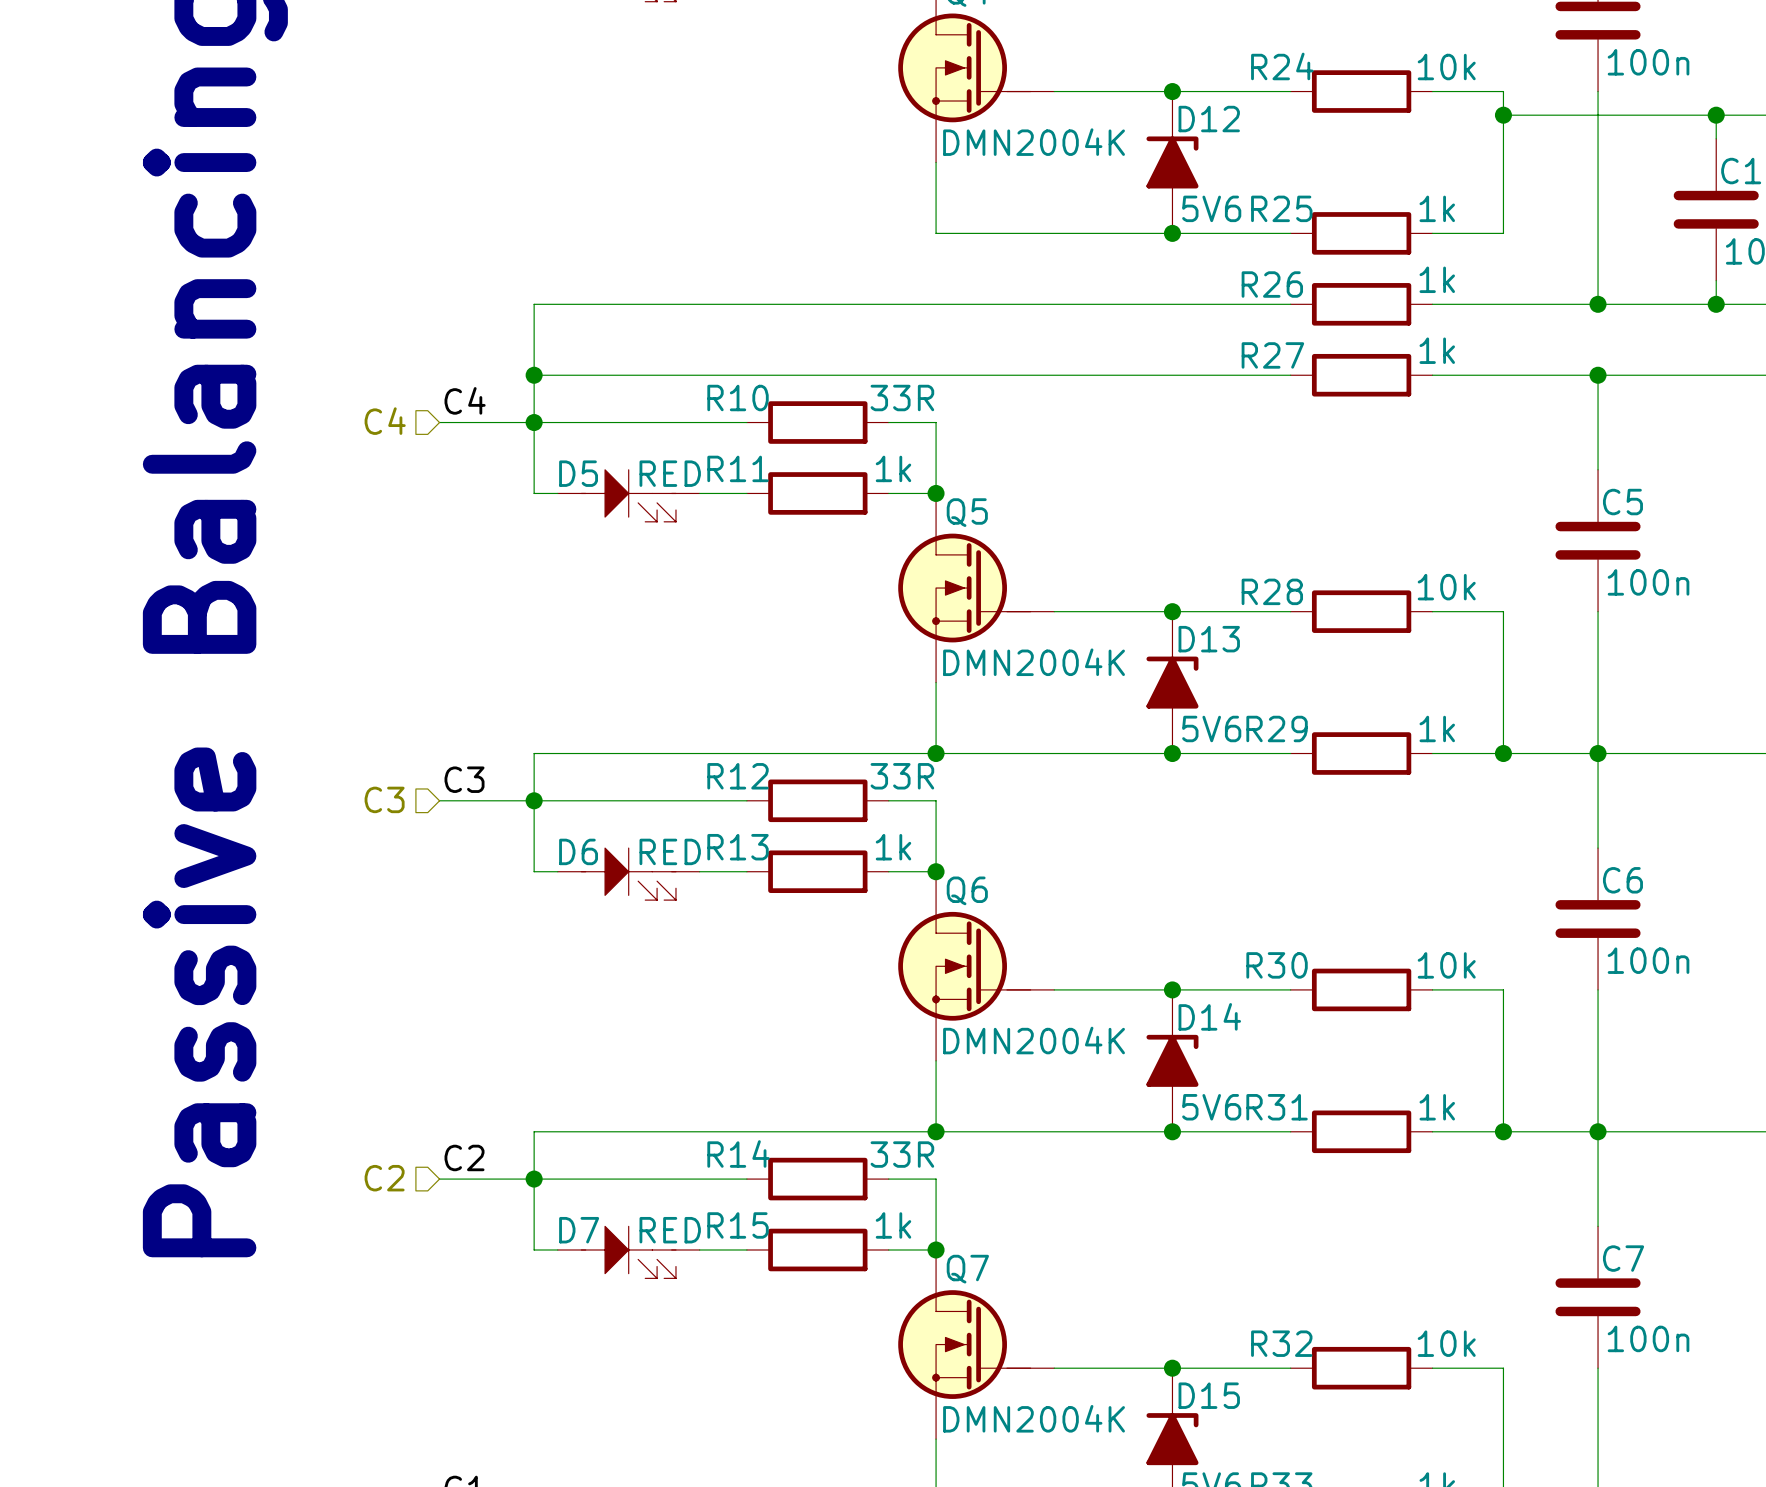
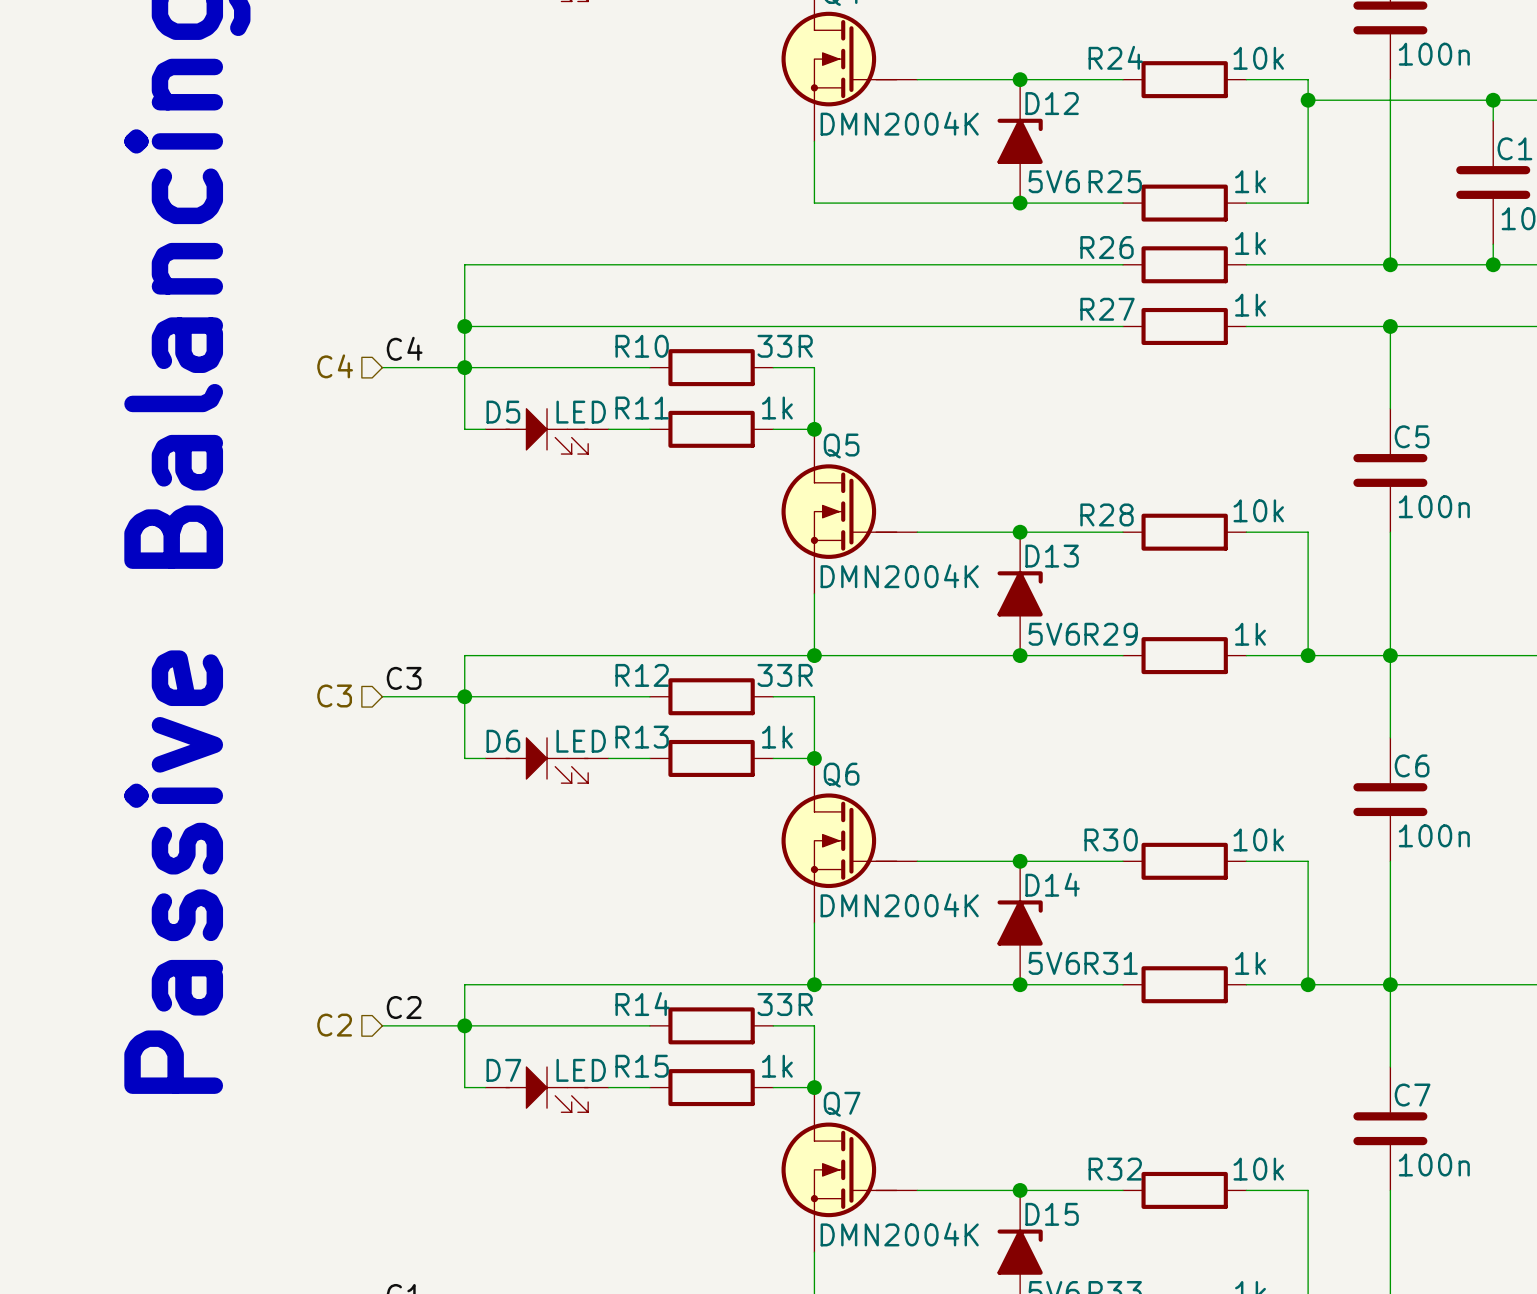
D5 value: RED (670, 473) -> LED (581, 412)
D6 value: RED (670, 851) -> LED (581, 741)
D7 value: RED (670, 1230) -> LED (581, 1070)

